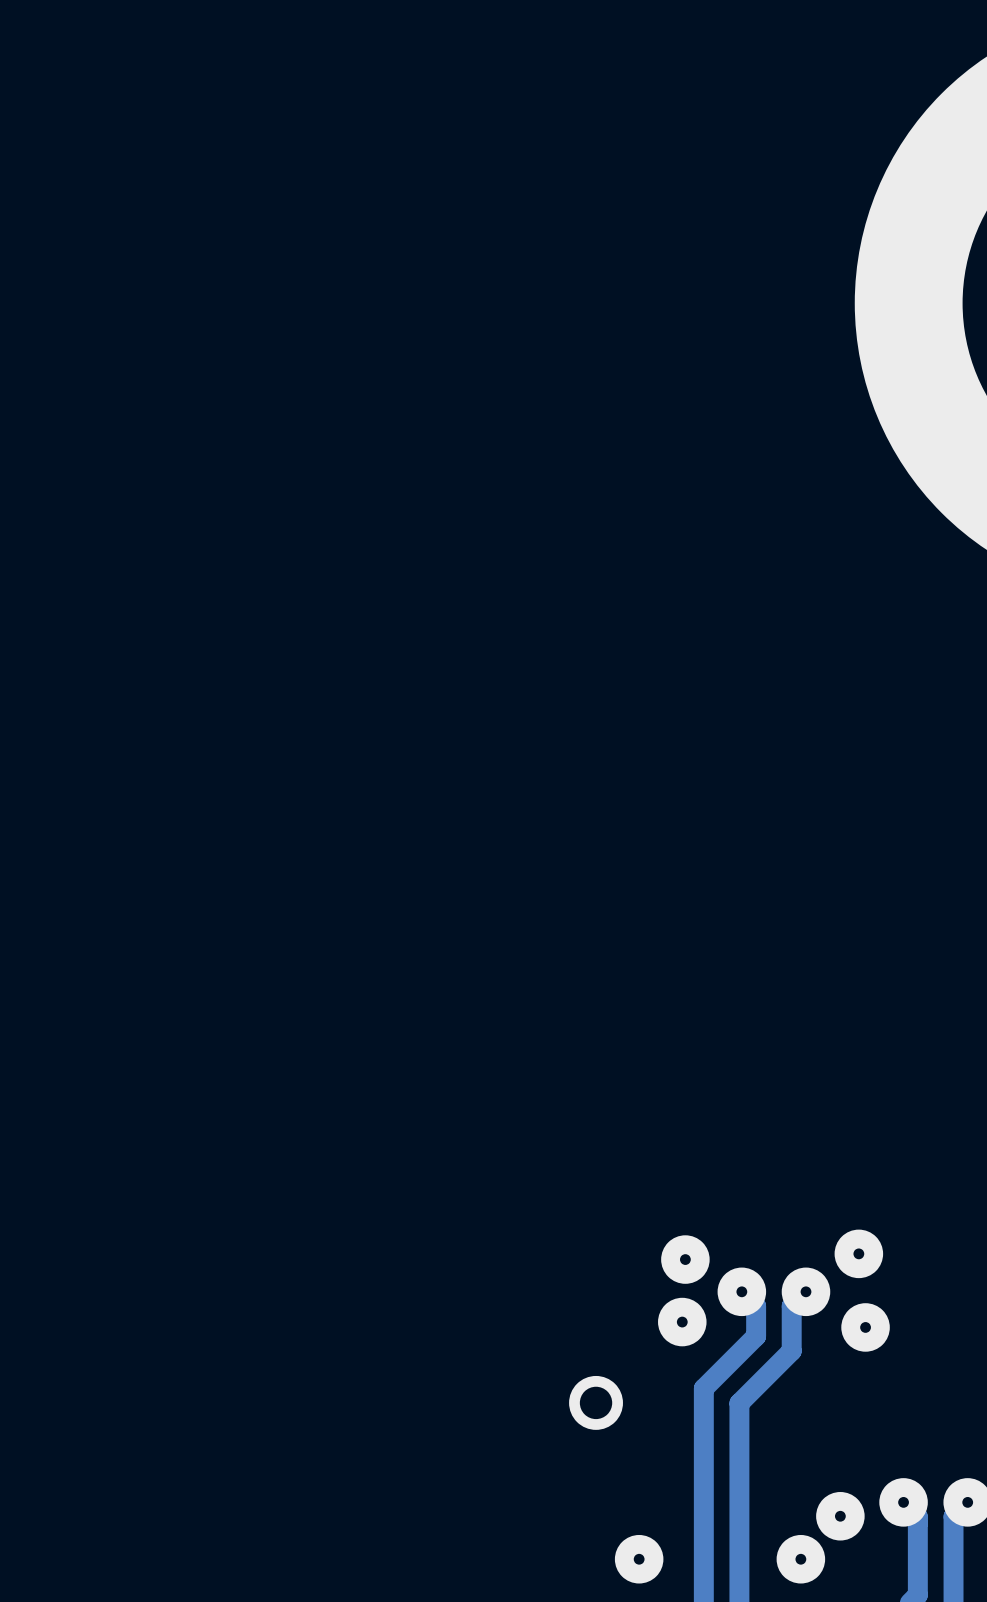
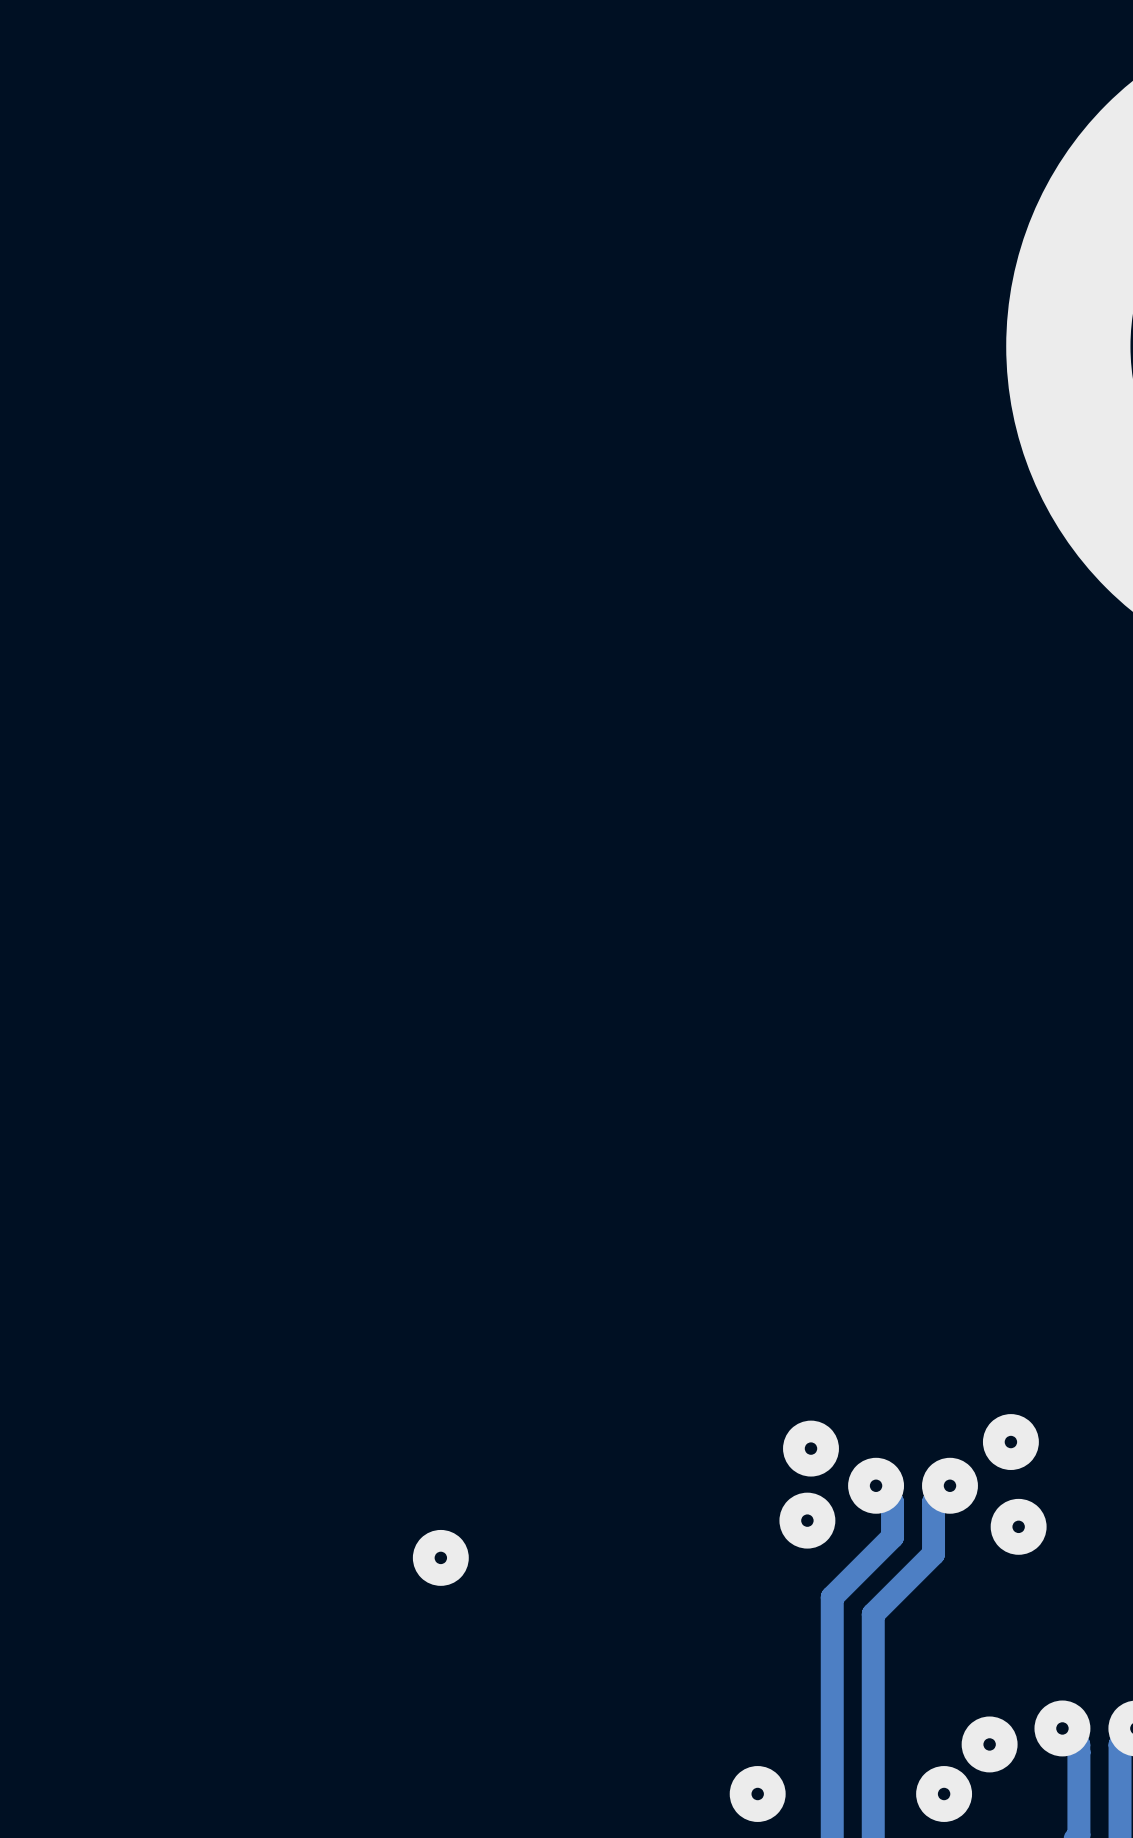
via: none -> (440, 1557)
via: (596, 1402) -> none

